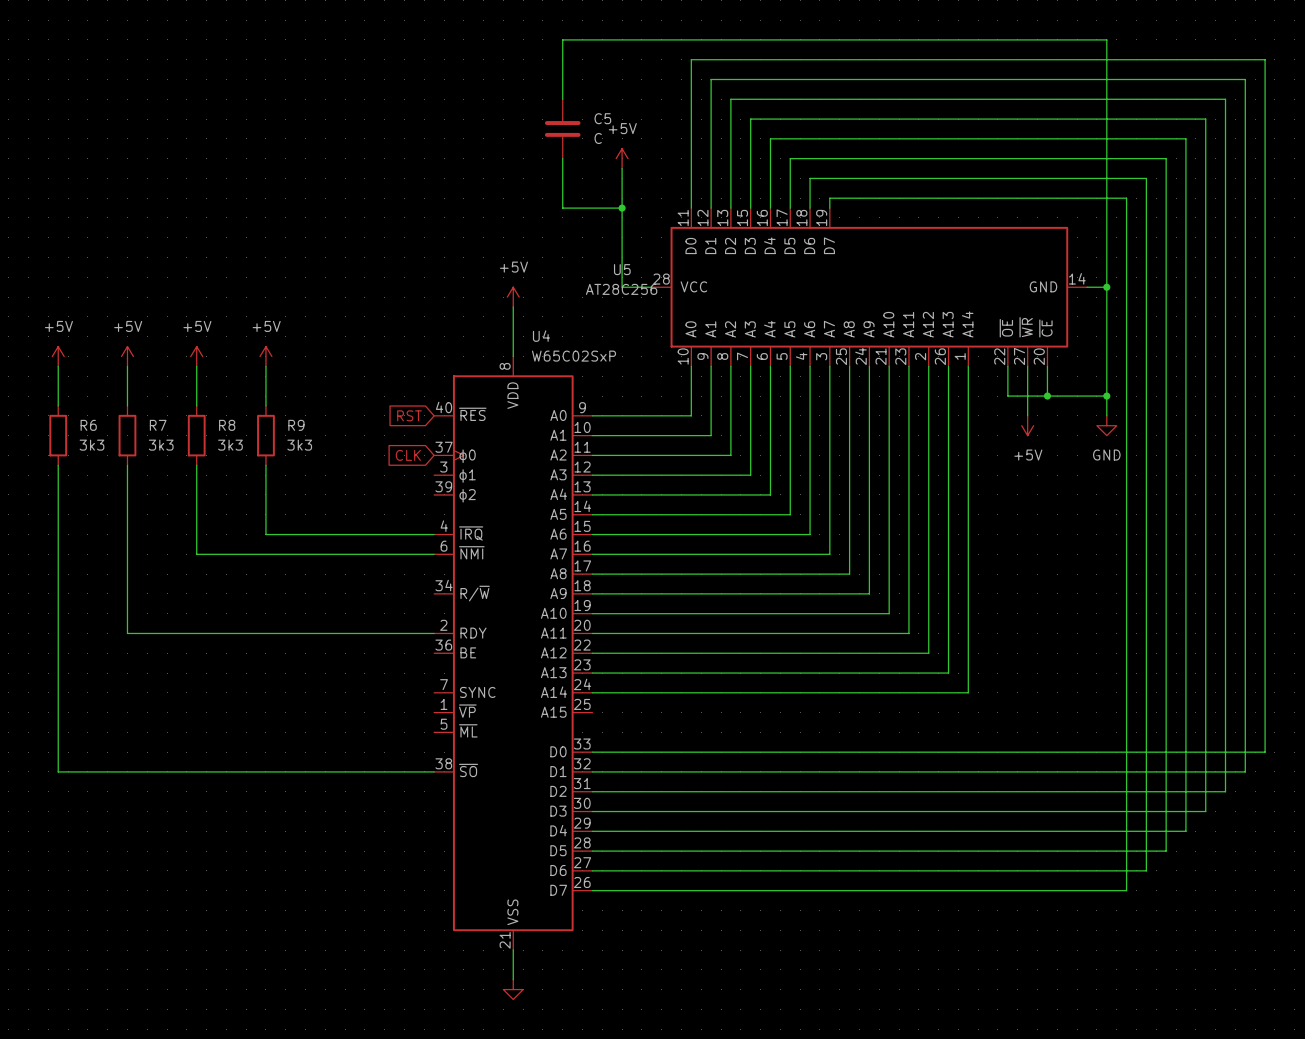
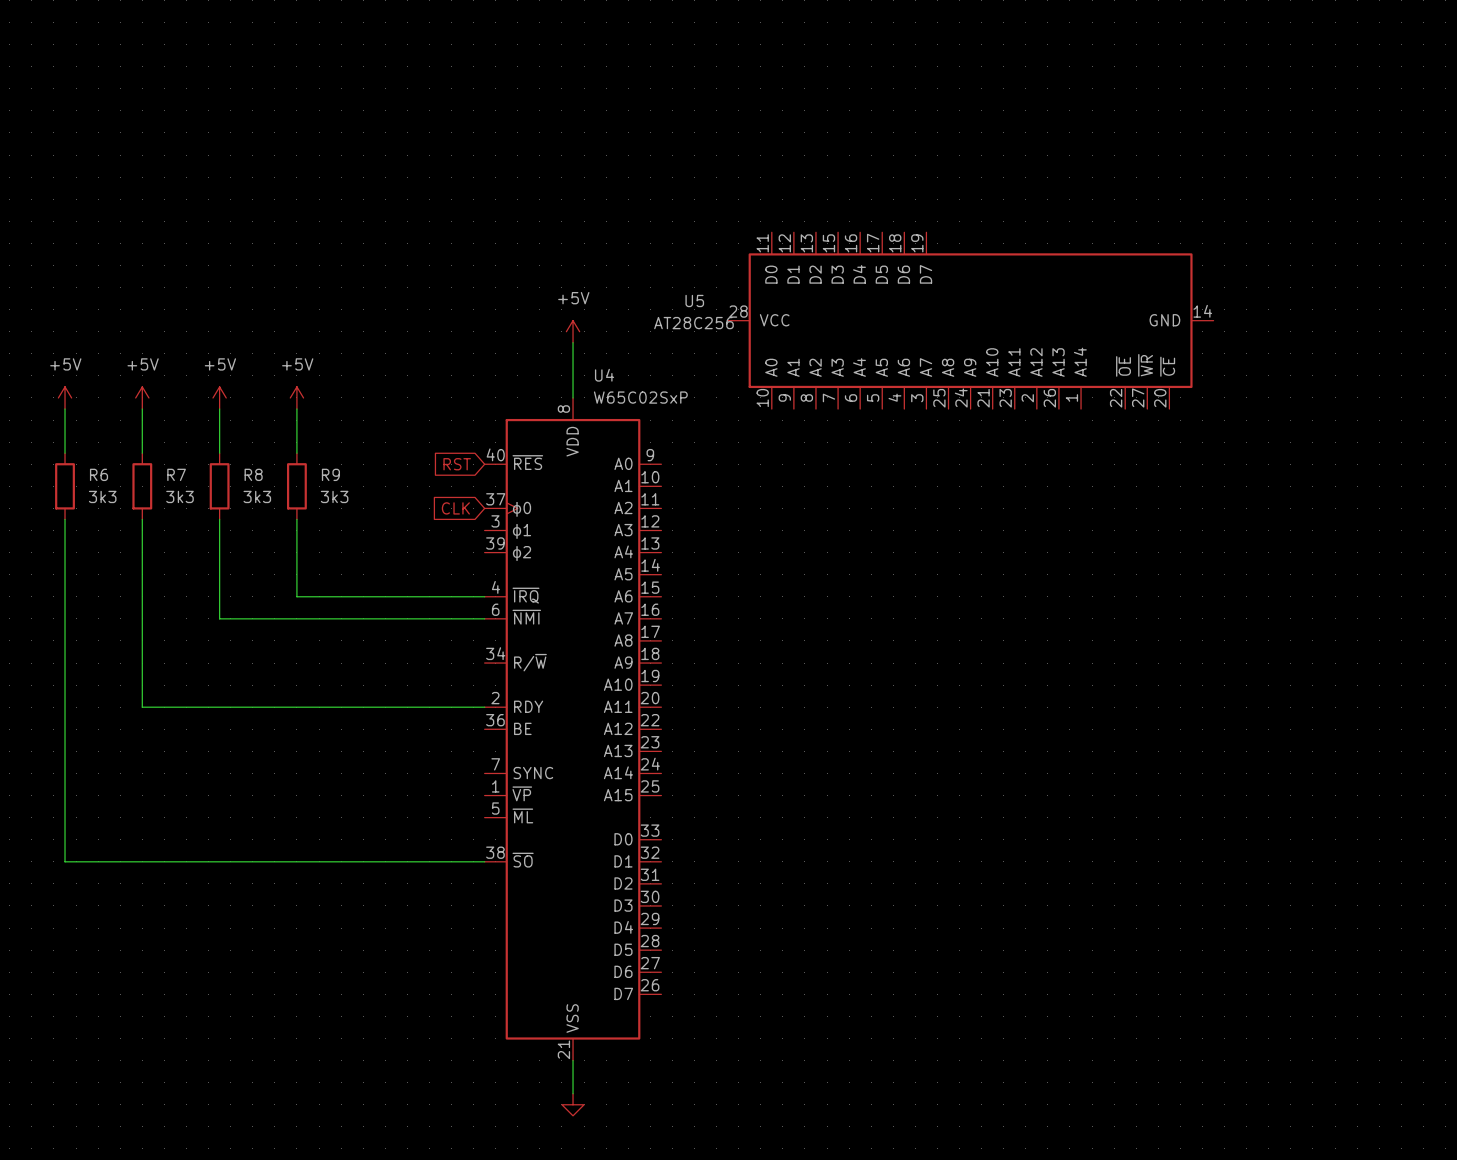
wire: (562, 99) (562, 39) (1106, 39) (1106, 415) -> none
C5: C (562, 128) -> none
wire: (562, 158) (562, 208) (622, 208) -> none
power symbol: +5V (622, 158) -> none
wire: (622, 168) (622, 287) (651, 287) -> none
junction: (622, 208) -> none
wire: (691, 208) (691, 59) (1265, 59) (1265, 752) (592, 752) -> none
wire: (711, 208) (711, 79) (1245, 79) (1245, 771) (592, 771) -> none
wire: (730, 208) (730, 99) (1225, 99) (1225, 791) (592, 791) -> none
wire: (750, 208) (750, 119) (1205, 119) (1205, 811) (592, 811) -> none
wire: (770, 208) (770, 138) (1185, 138) (1185, 831) (592, 831) -> none
wire: (790, 208) (790, 158) (1166, 158) (1166, 851) (592, 851) -> none
wire: (810, 208) (810, 178) (1146, 178) (1146, 870) (592, 870) -> none
wire: (829, 208) (829, 198) (1126, 198) (1126, 890) (592, 890) -> none
wire: (1087, 287) (1106, 287) -> none
junction: (1106, 287) -> none
wire: (691, 366) (691, 415) (592, 415) -> none
wire: (711, 366) (711, 435) (592, 435) -> none
wire: (730, 366) (730, 455) (592, 455) -> none
wire: (750, 366) (750, 475) (592, 475) -> none
wire: (770, 366) (770, 494) (592, 494) -> none
wire: (790, 366) (790, 514) (592, 514) -> none
wire: (810, 366) (810, 534) (592, 534) -> none
wire: (829, 366) (829, 554) (592, 554) -> none
wire: (849, 366) (849, 574) (592, 574) -> none
wire: (869, 366) (869, 593) (592, 593) -> none
wire: (889, 366) (889, 613) (592, 613) -> none
wire: (908, 366) (908, 633) (592, 633) -> none
wire: (928, 366) (928, 653) (592, 653) -> none
wire: (948, 366) (948, 673) (592, 673) -> none
wire: (968, 366) (968, 692) (592, 692) -> none
wire: (1007, 366) (1007, 396) (1106, 396) -> none
wire: (1027, 366) (1027, 415) -> none
wire: (1047, 366) (1047, 396) -> none
junction: (1047, 396) -> none
junction: (1106, 396) -> none
power symbol: +5V (1027, 425) -> none
power symbol: GND (1106, 425) -> none

